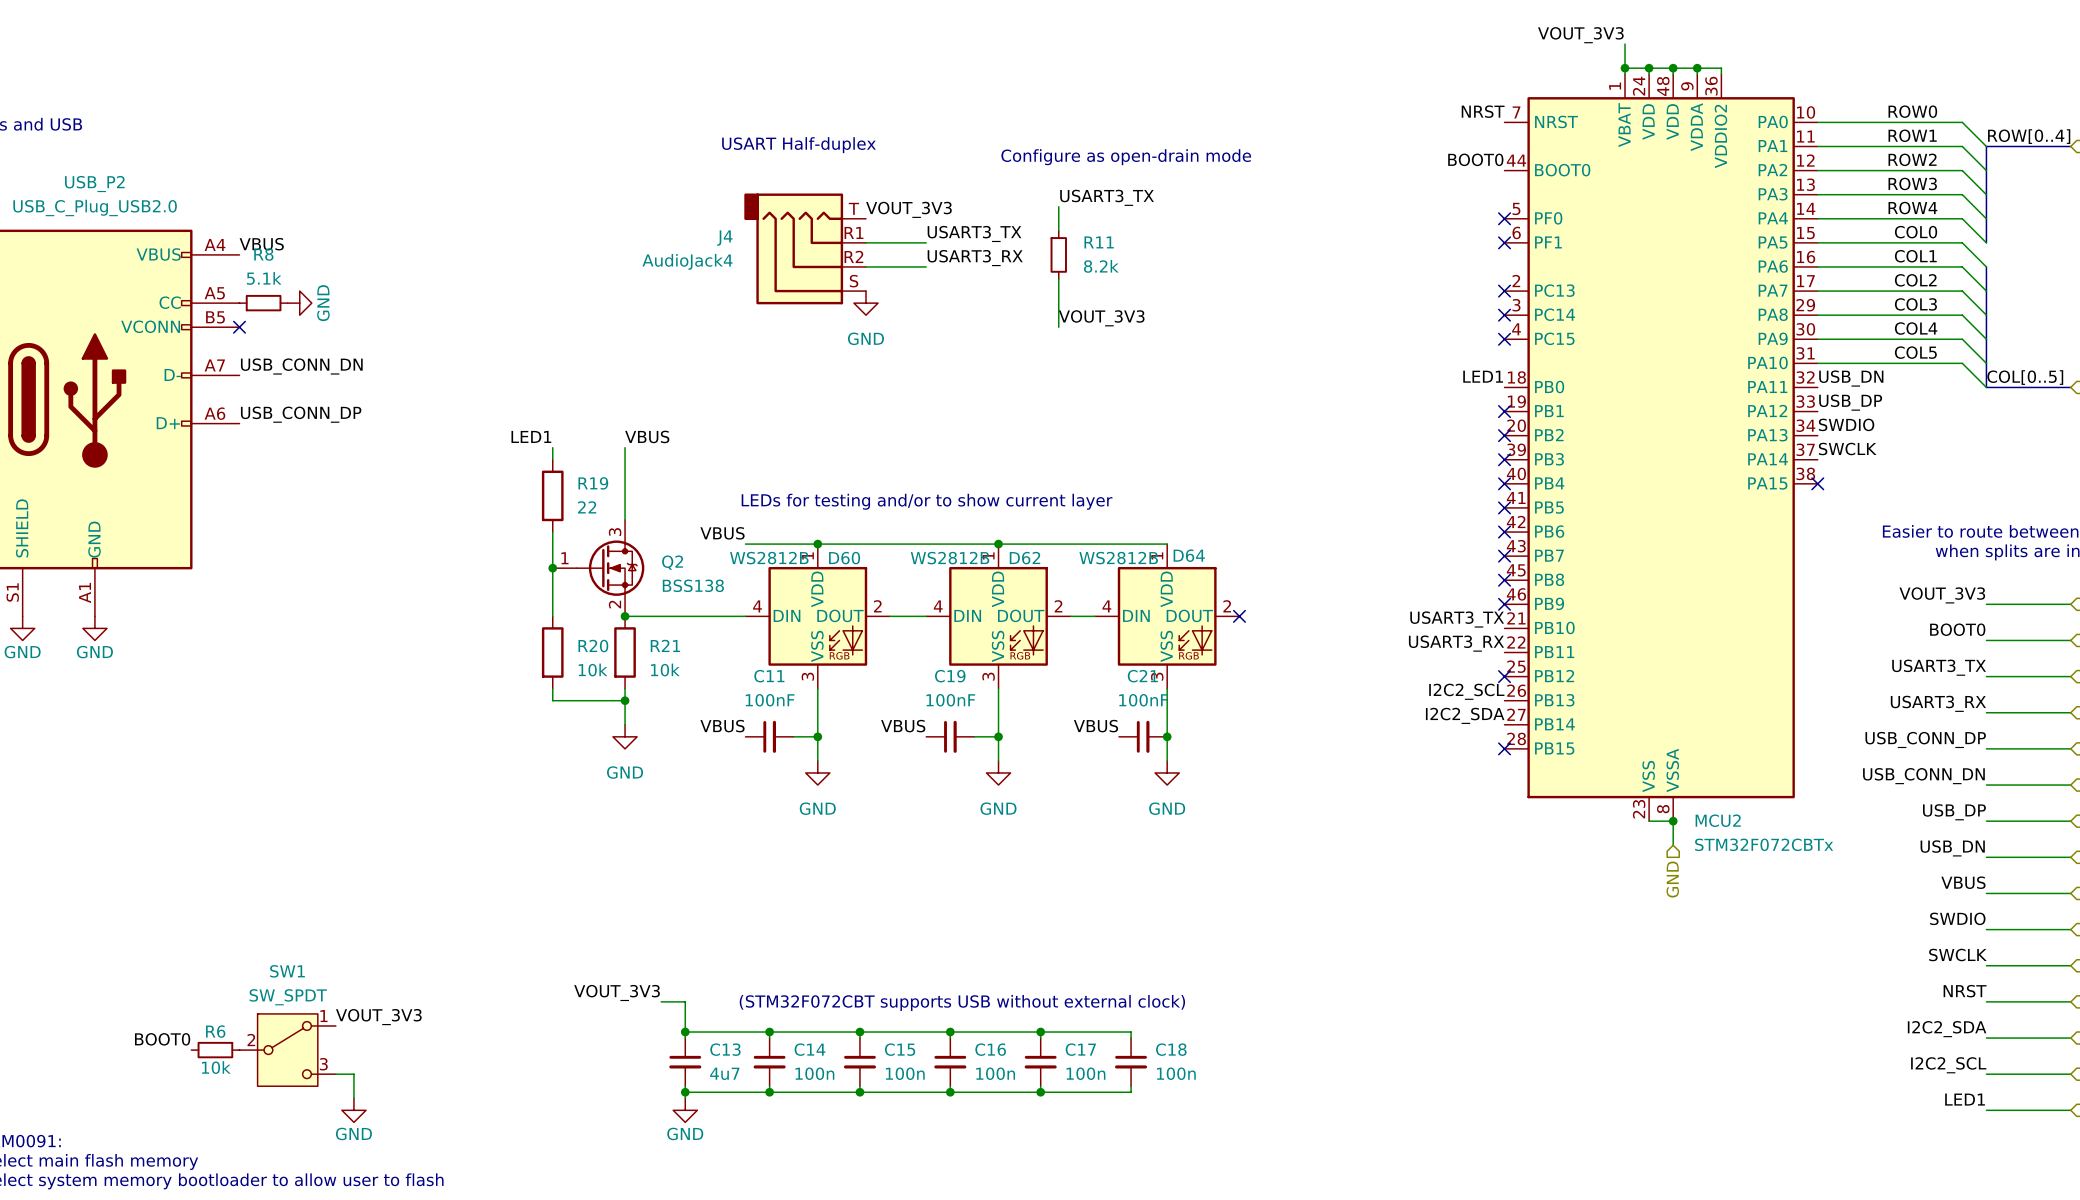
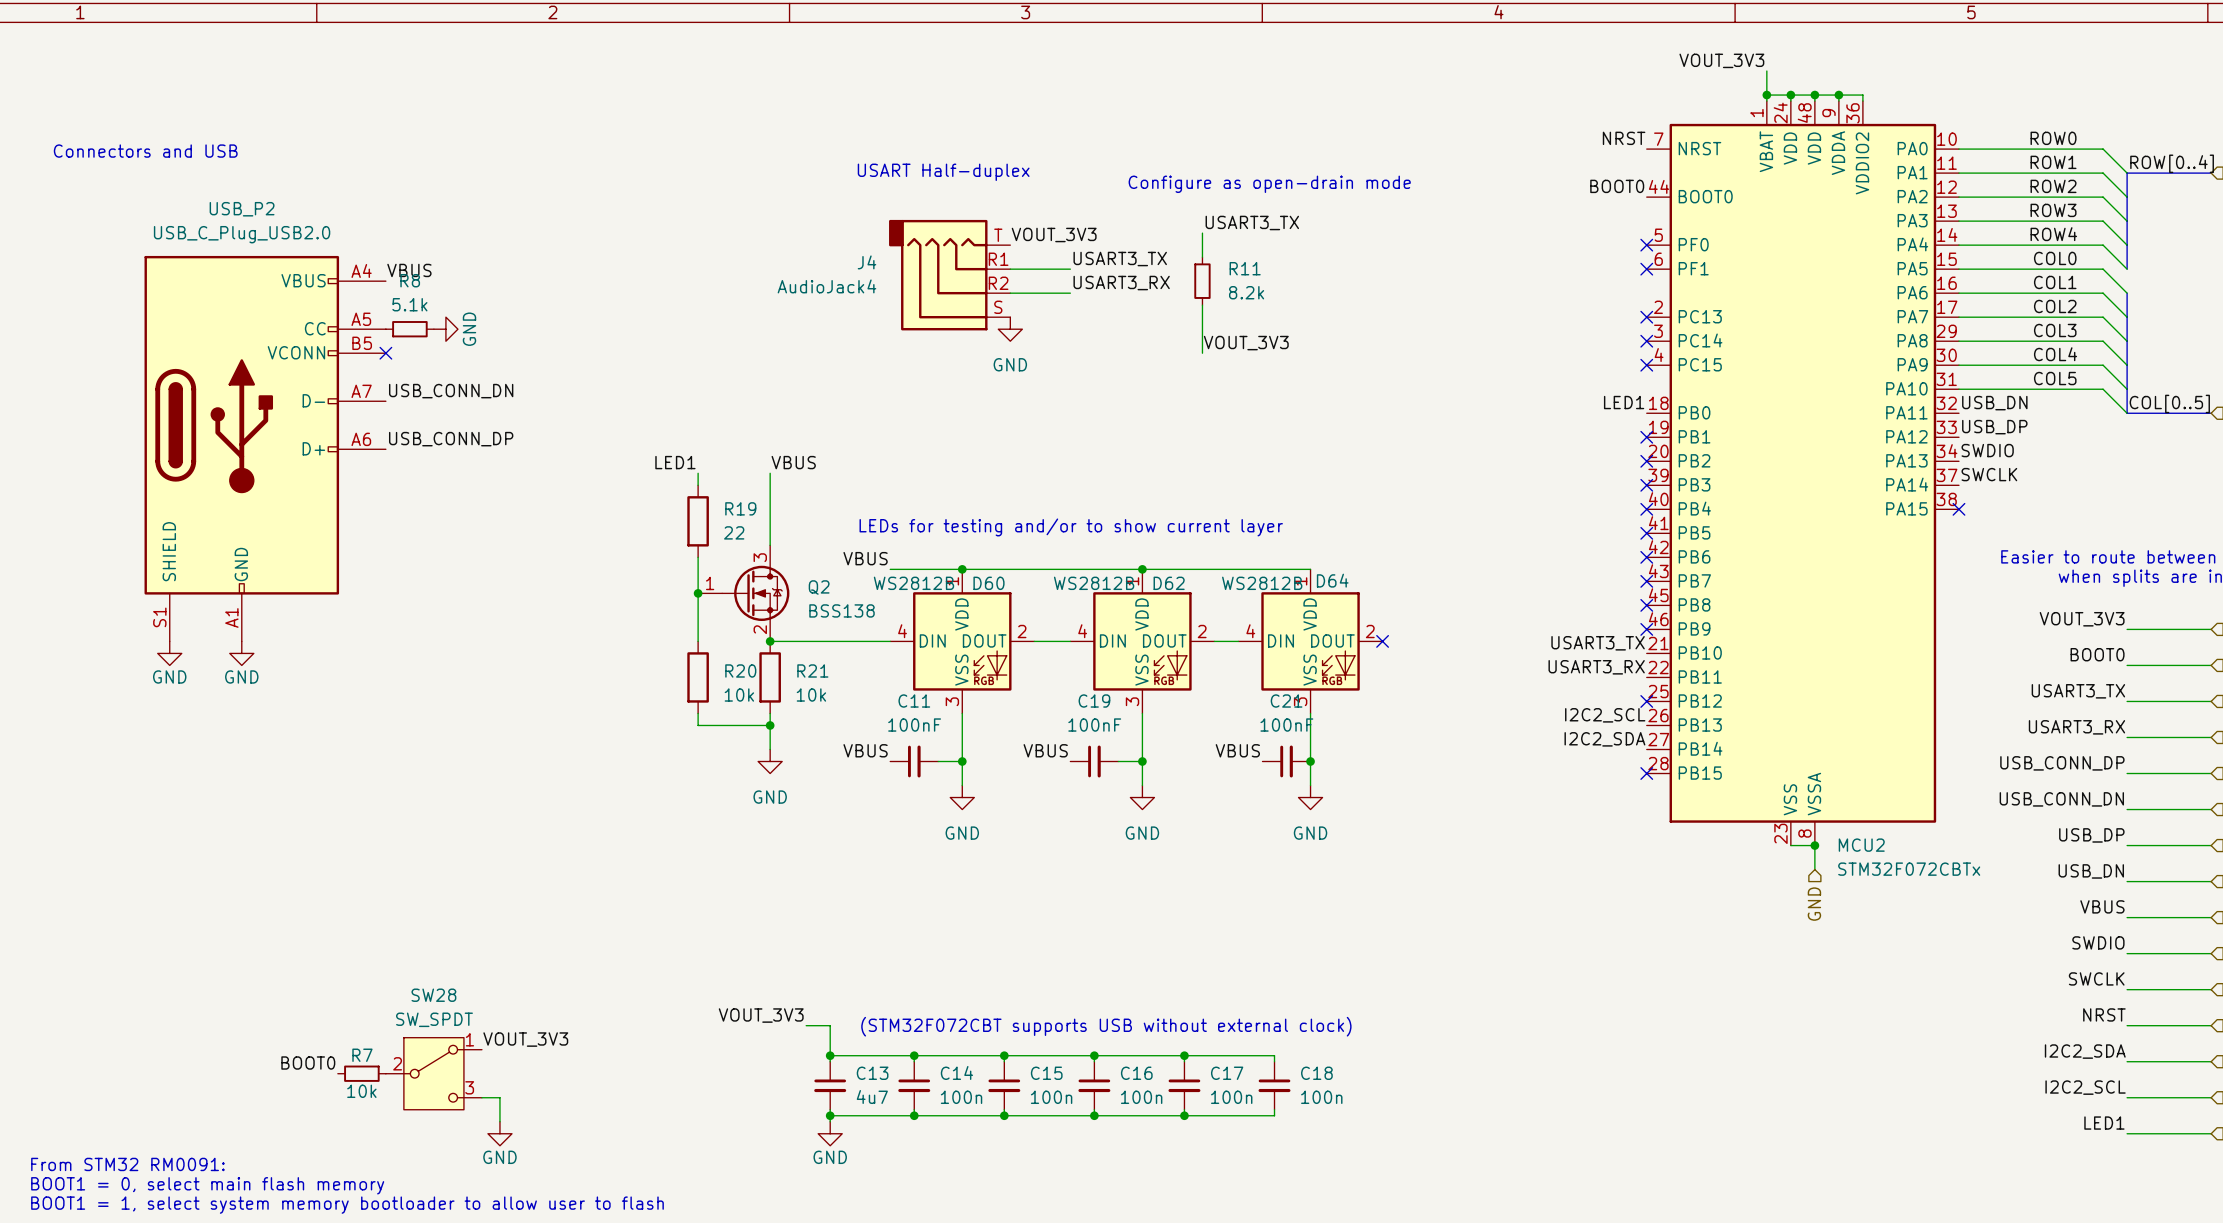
SW1 name: SW1 (287, 971) -> SW28 (433, 995)
R6 name: R6 (215, 1031) -> R7 (362, 1055)

